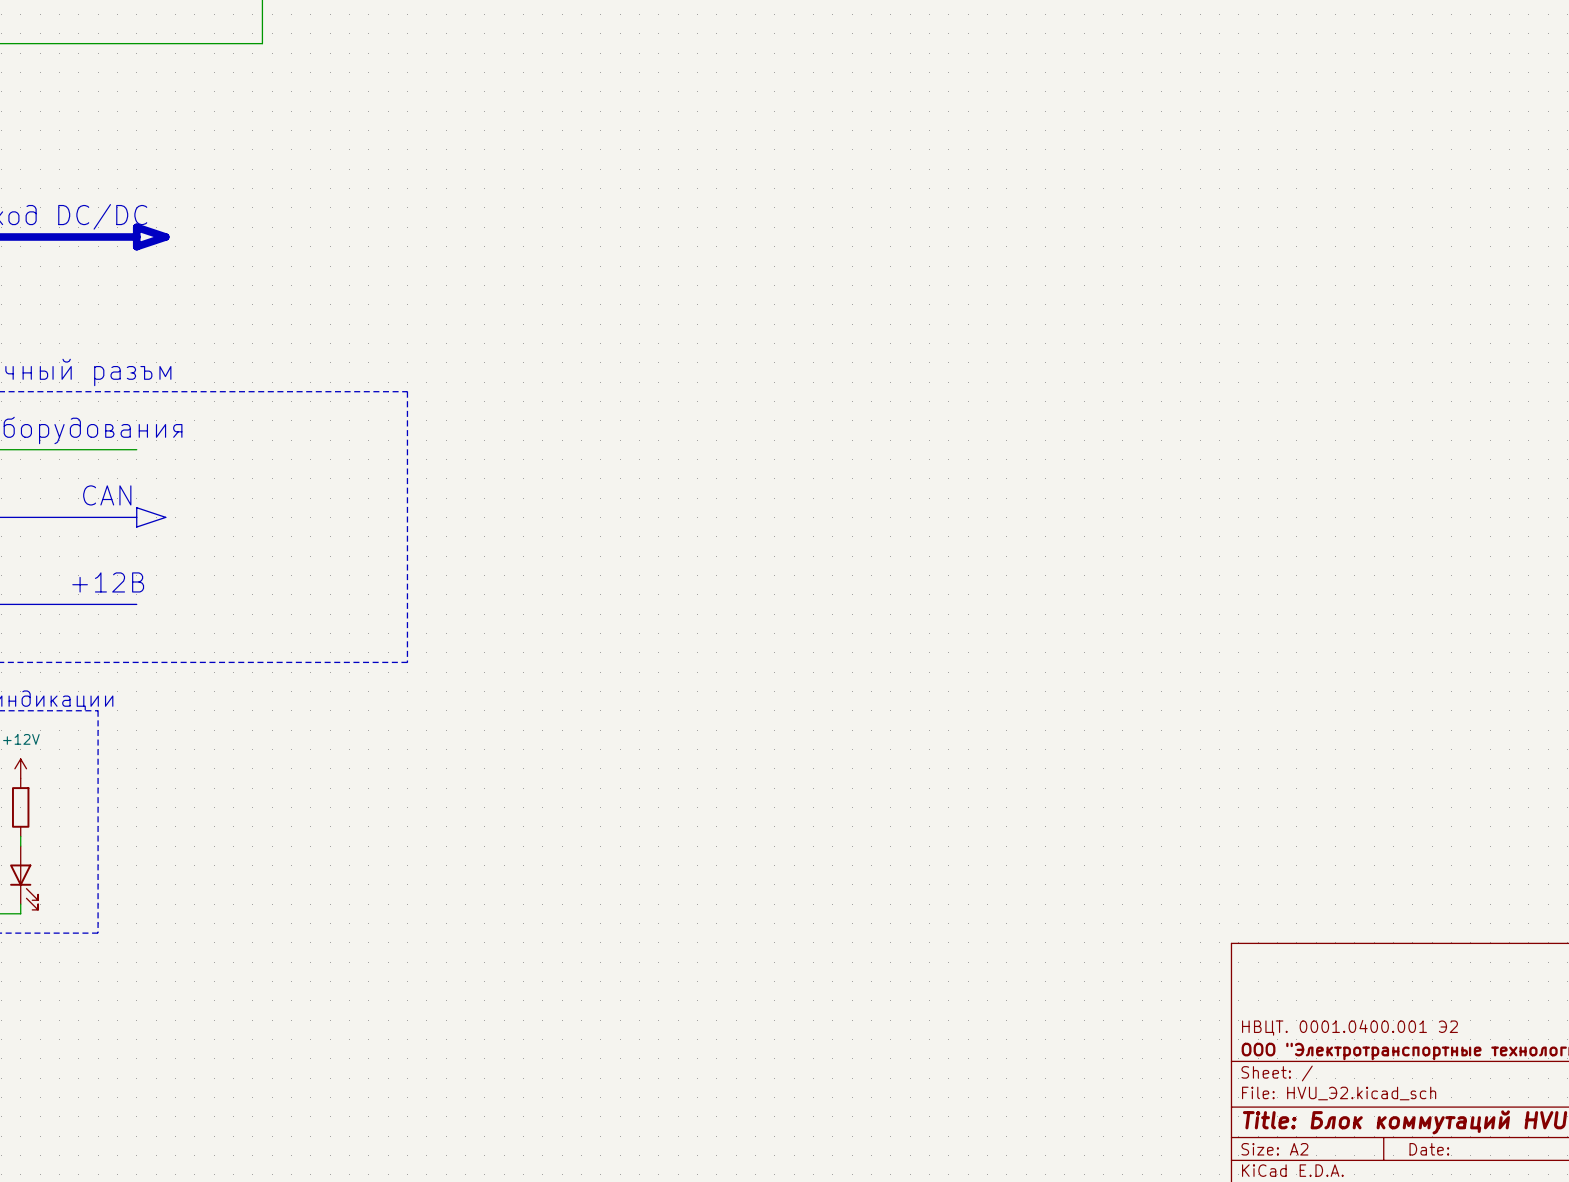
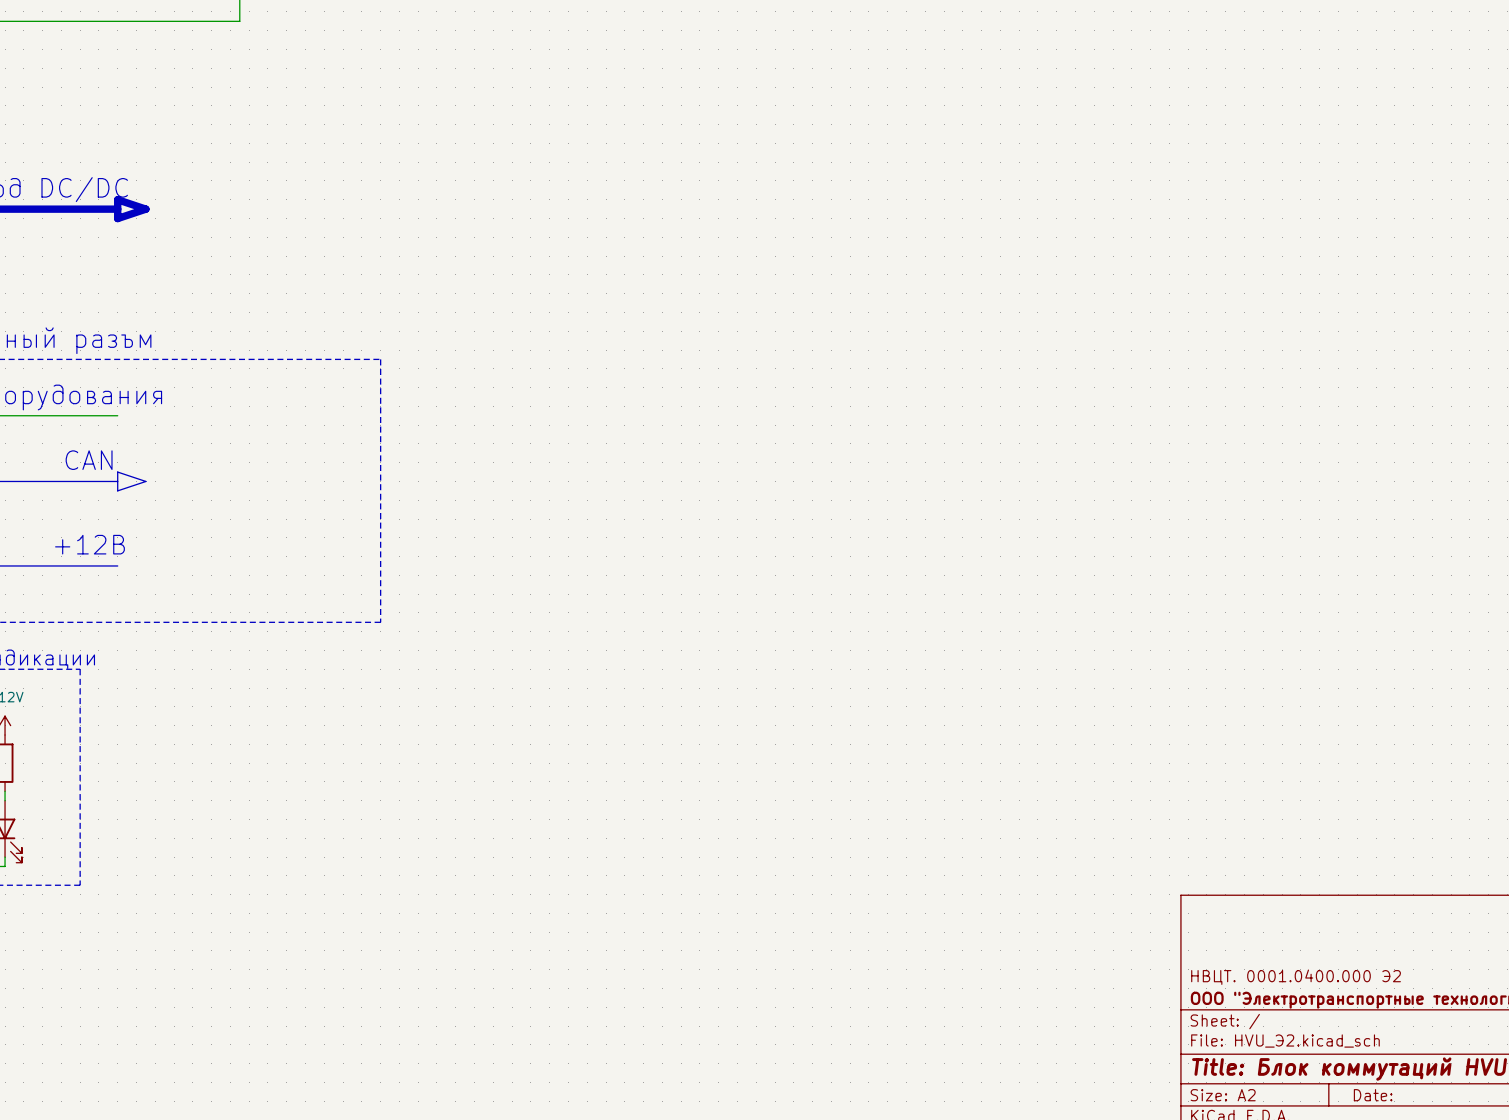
title block: НВЦТ. 0001.0400.001 Э2 (1349, 1027) -> НВЦТ. 0001.0400.000 Э2 (1296, 977)

